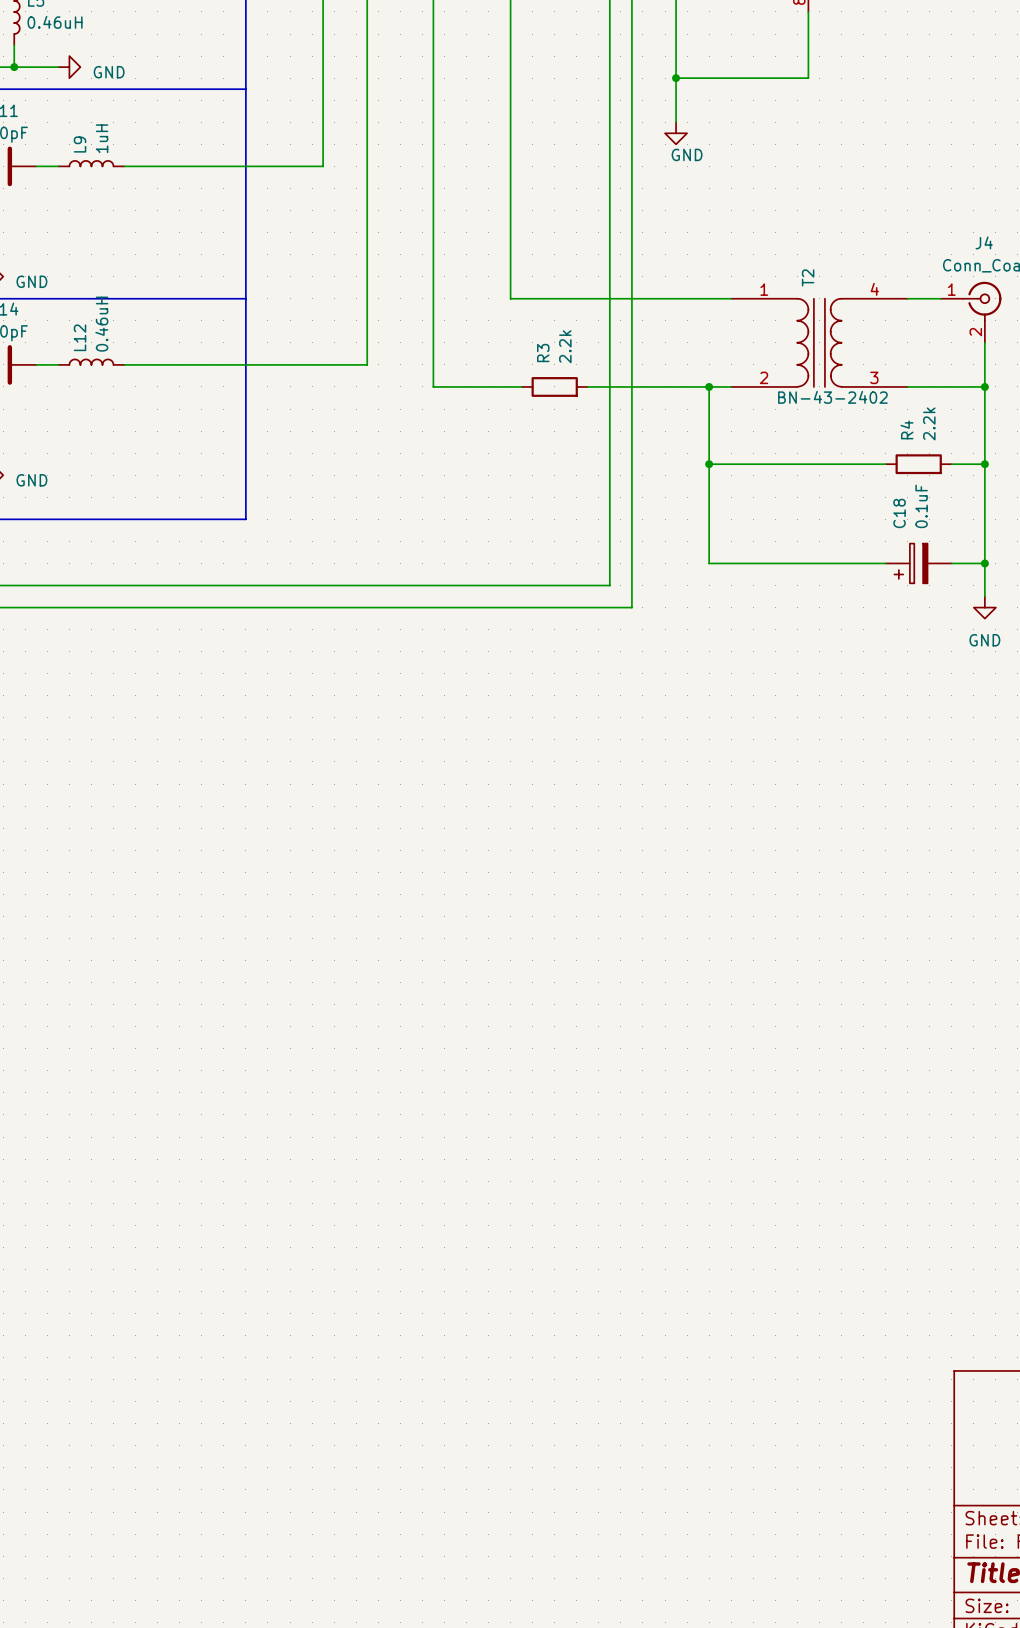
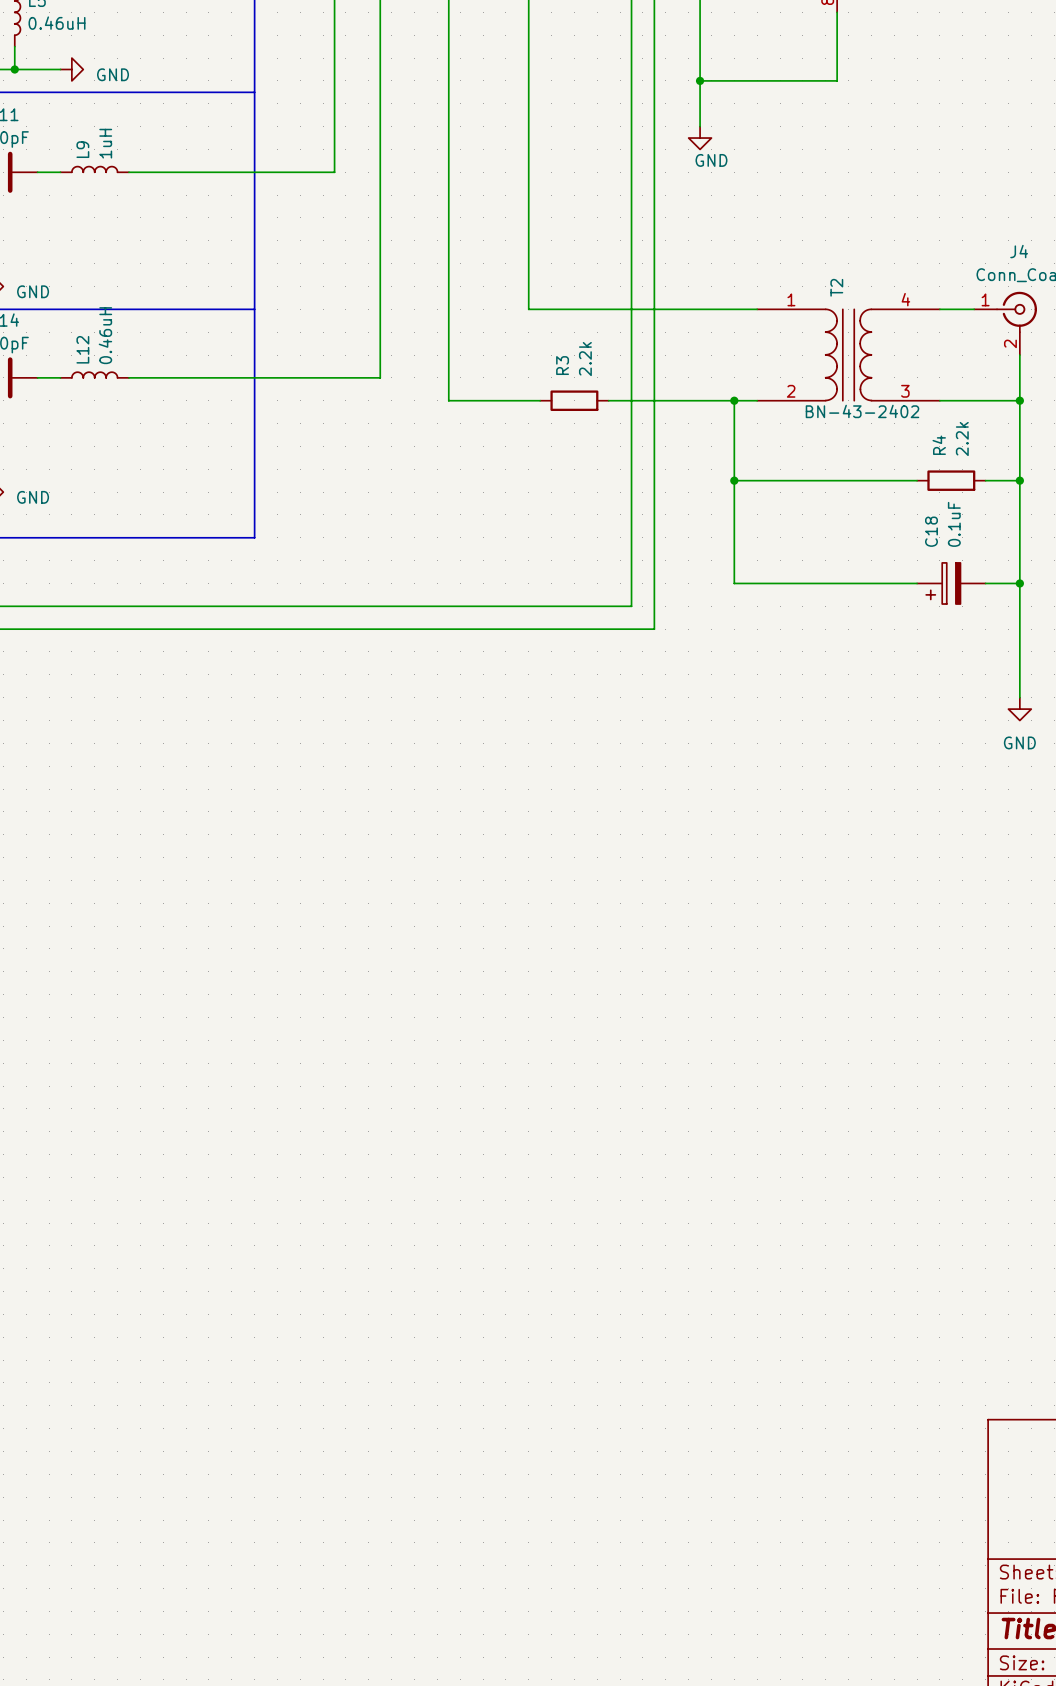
wire: none -> (1019, 617) (1019, 697)
power symbol position: GND (984, 607) -> GND (1019, 709)

